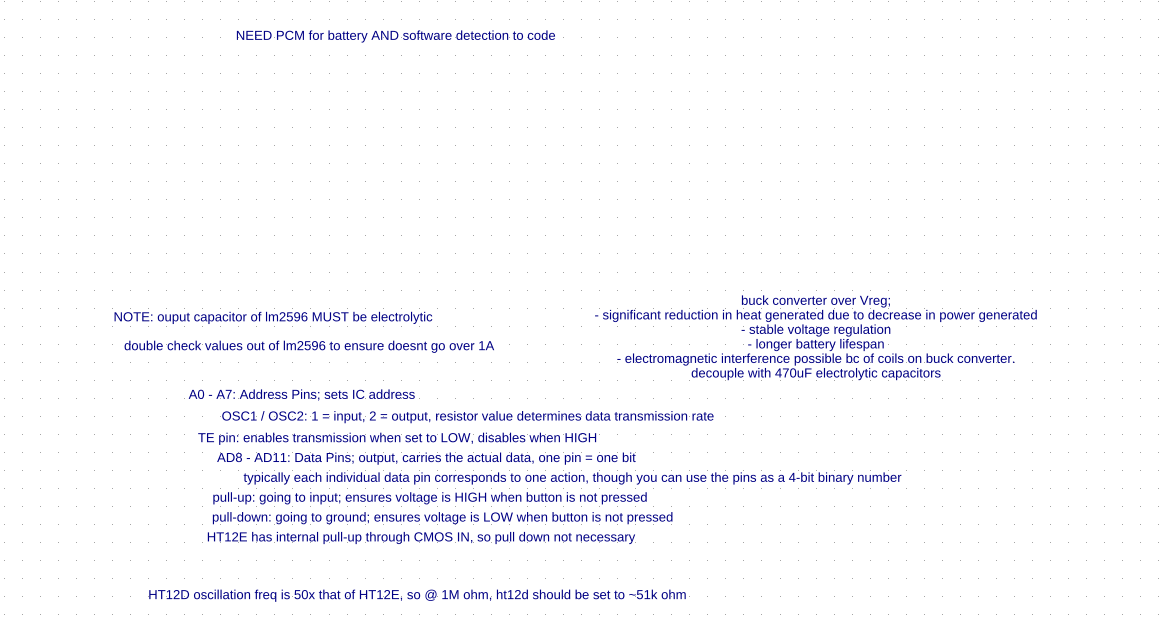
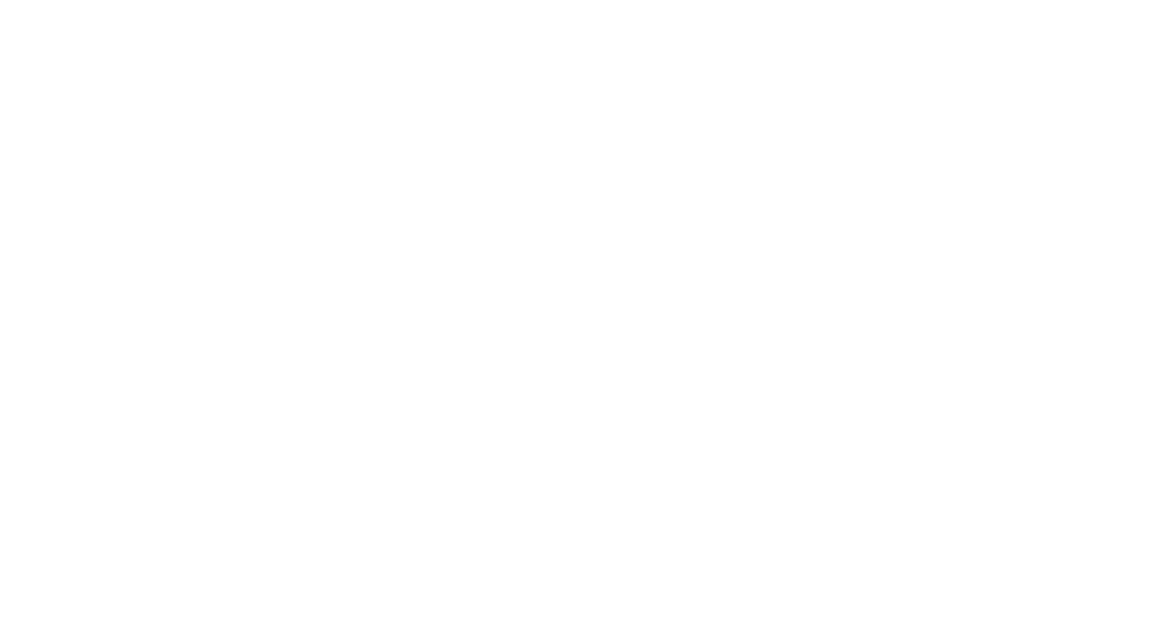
text: NEED PCM for battery AND software detection to code (395, 36) -> none
text: buck converter over Vreg; (815, 301) -> none
text: - significant reduction in heat generated due to decrease in power generated (815, 315) -> none
text: NOTE: ouput capacitor of lm2596 MUST be electrolytic (273, 317) -> none
text: - stable voltage regulation (815, 330) -> none
text: - longer battery lifespan (815, 345) -> none
text: double check values out of lm2596 to ensure doesnt go over 1A (309, 346) -> none
text: - electromagnetic interference possible bc of coils on buck converter. (815, 359) -> none
text: decouple with 470uF electrolytic capacitors (816, 374) -> none
text: A0 - A7: Address Pins; sets IC address (301, 394) -> none
text: OSC1 / OSC2: 1 = input, 2 = output, resistor value determines data transmission rate (467, 417) -> none
text: TE pin: enables transmission when set to LOW, disables when HIGH (397, 438) -> none
text: AD8 - AD11: Data Pins; output, carries the actual data, one pin = one bit (426, 458) -> none
text: typically each individual data pin corresponds to one action, though you can use the pins as a 4-bit binary number (572, 478) -> none
text: pull-up: going to input; ensures voltage is HIGH when button is not pressed (430, 498) -> none
text: pull-down: going to ground; ensures voltage is LOW when button is not pressed (442, 518) -> none
text: HT12E has internal pull-up through CMOS IN, so pull down not necessary (421, 538) -> none
text: HT12D oscillation freq is 50x that of HT12E, so @ 1M ohm, ht12d should be set to ~51k ohm (417, 595) -> none

